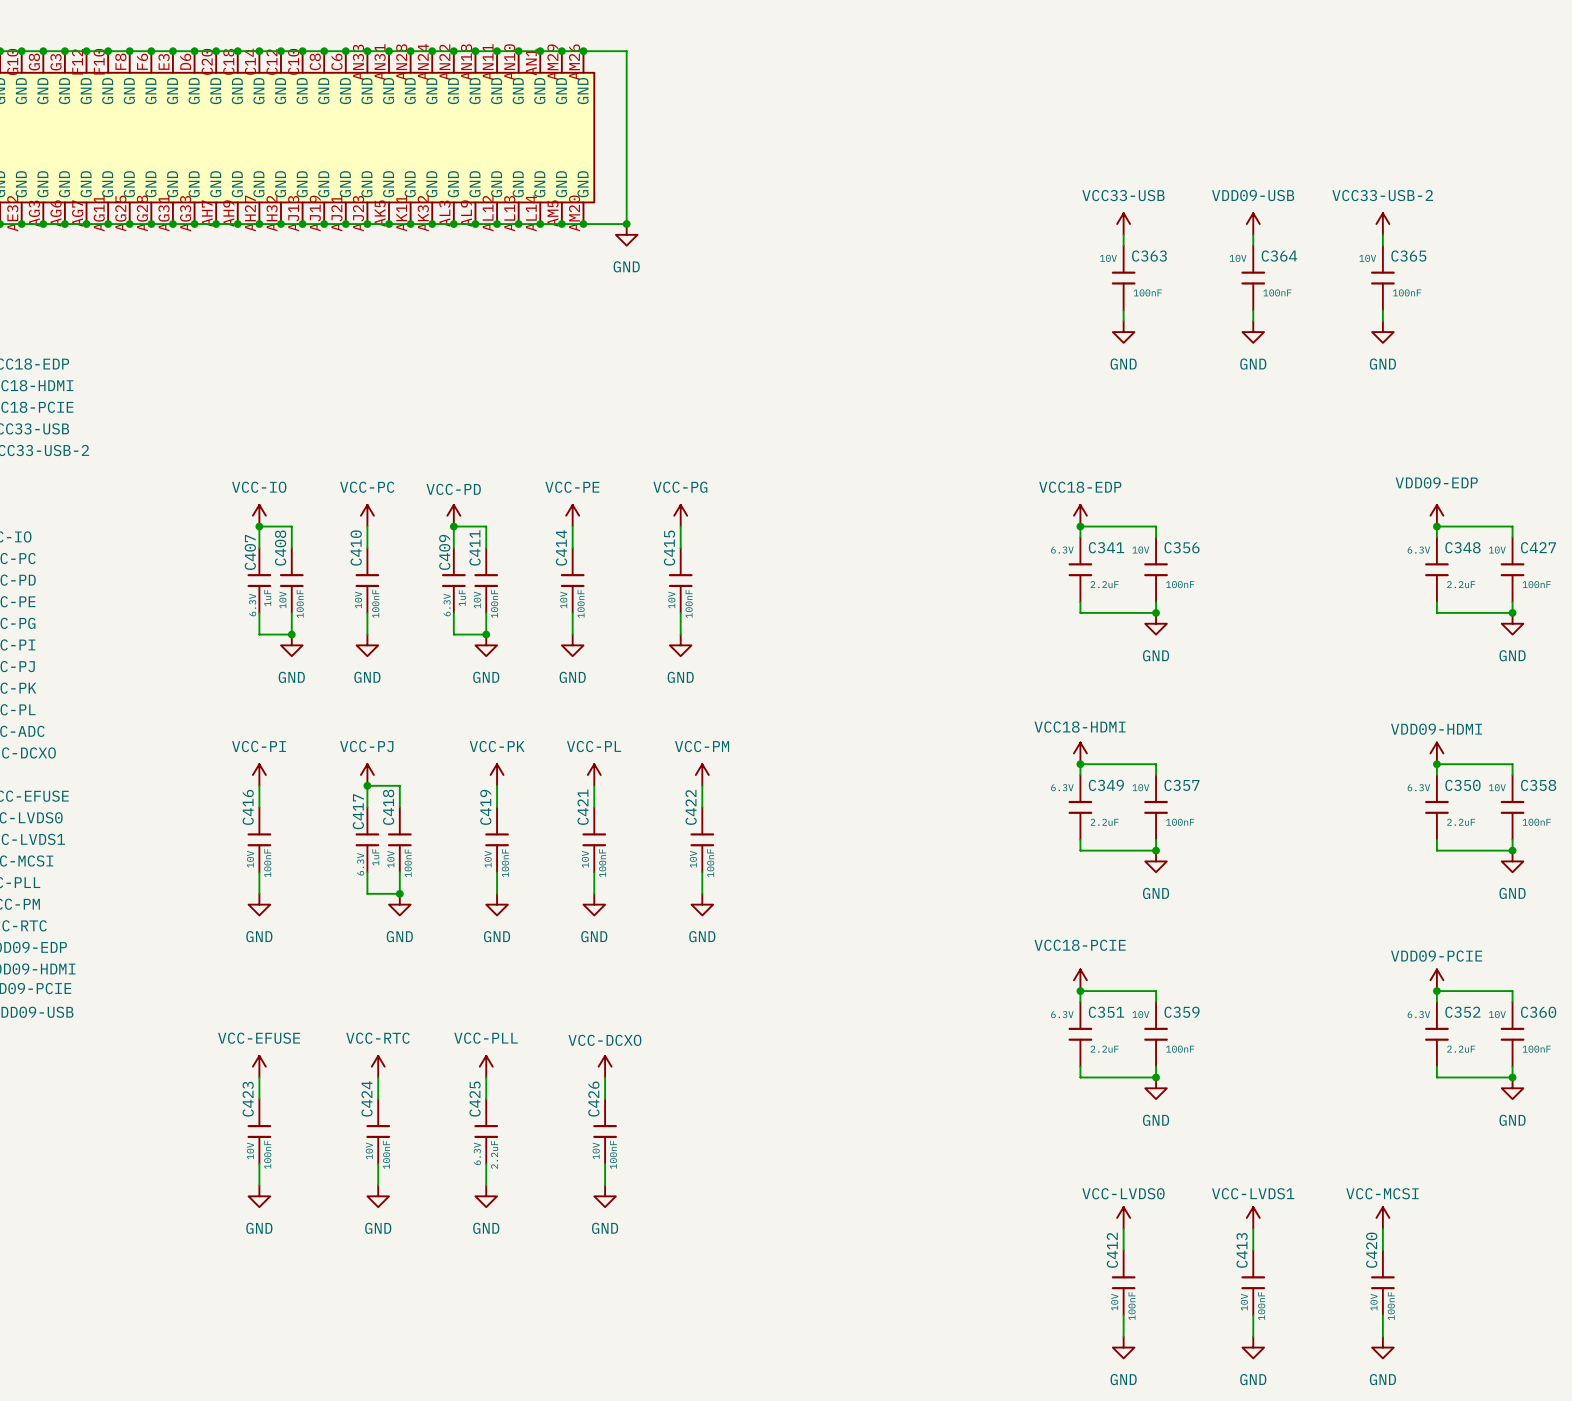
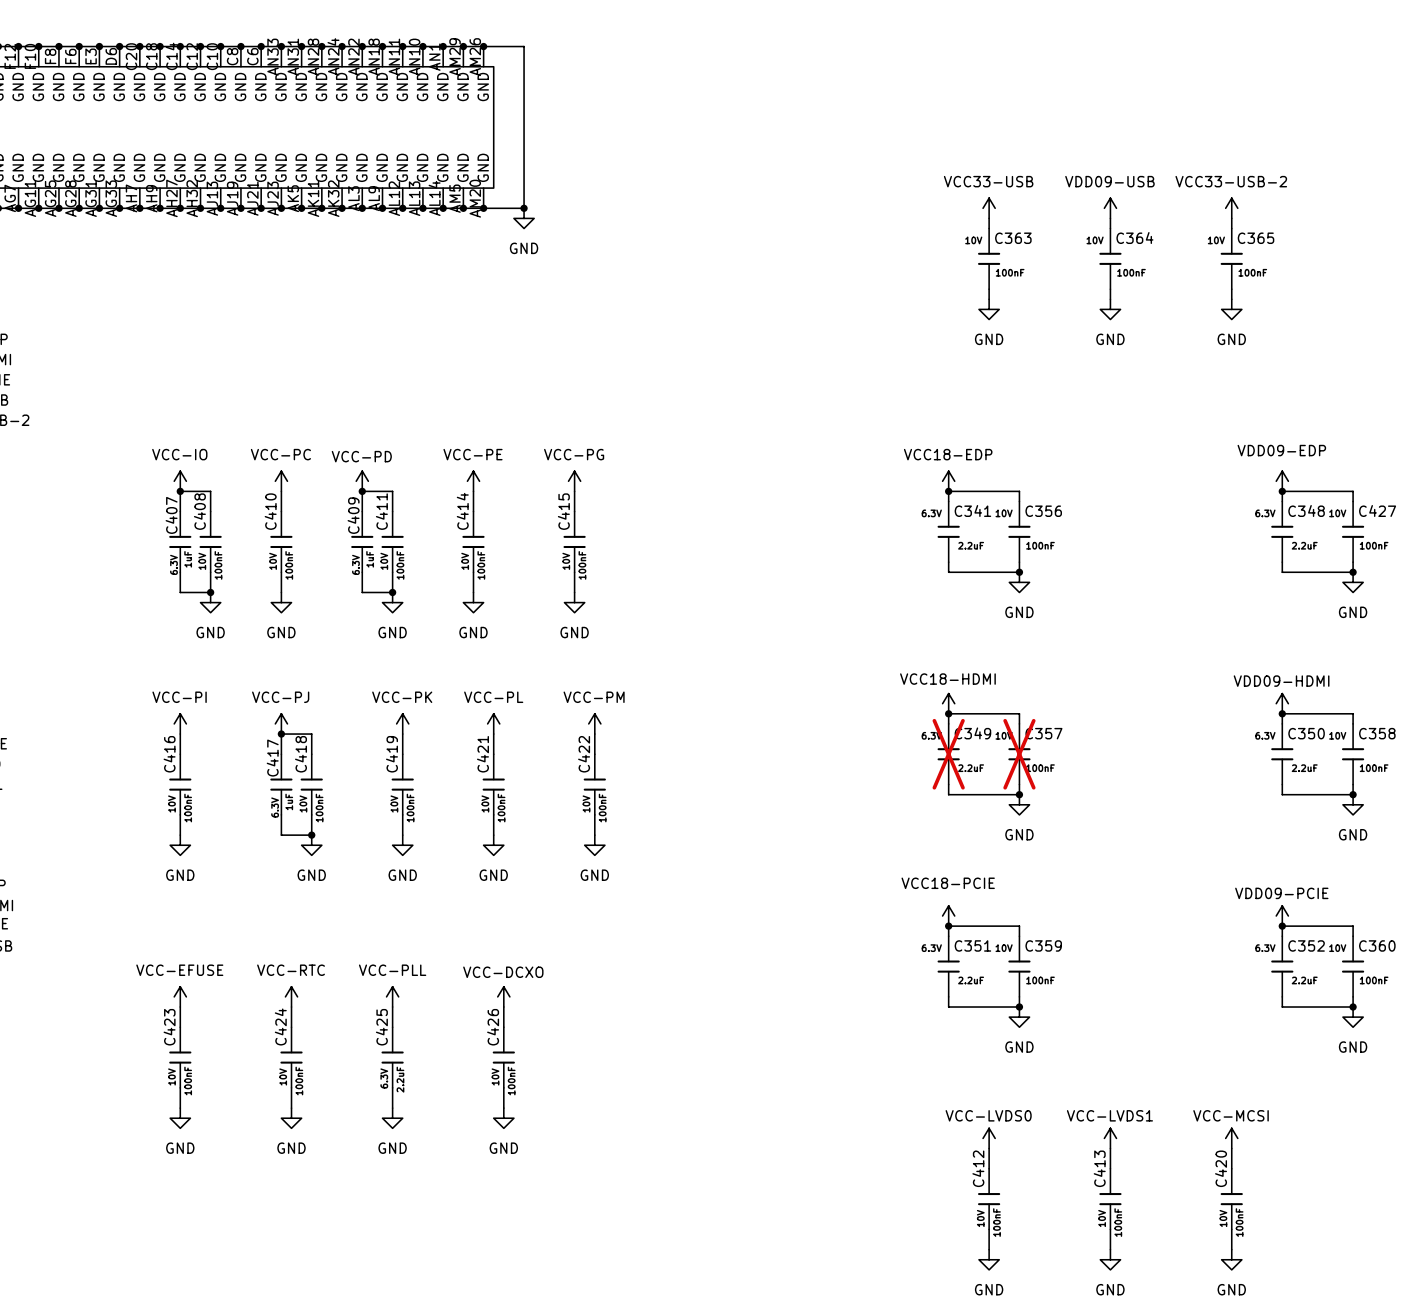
C349 do-not-place cross: none -> (948, 754)
C357 do-not-place cross: none -> (1019, 754)

